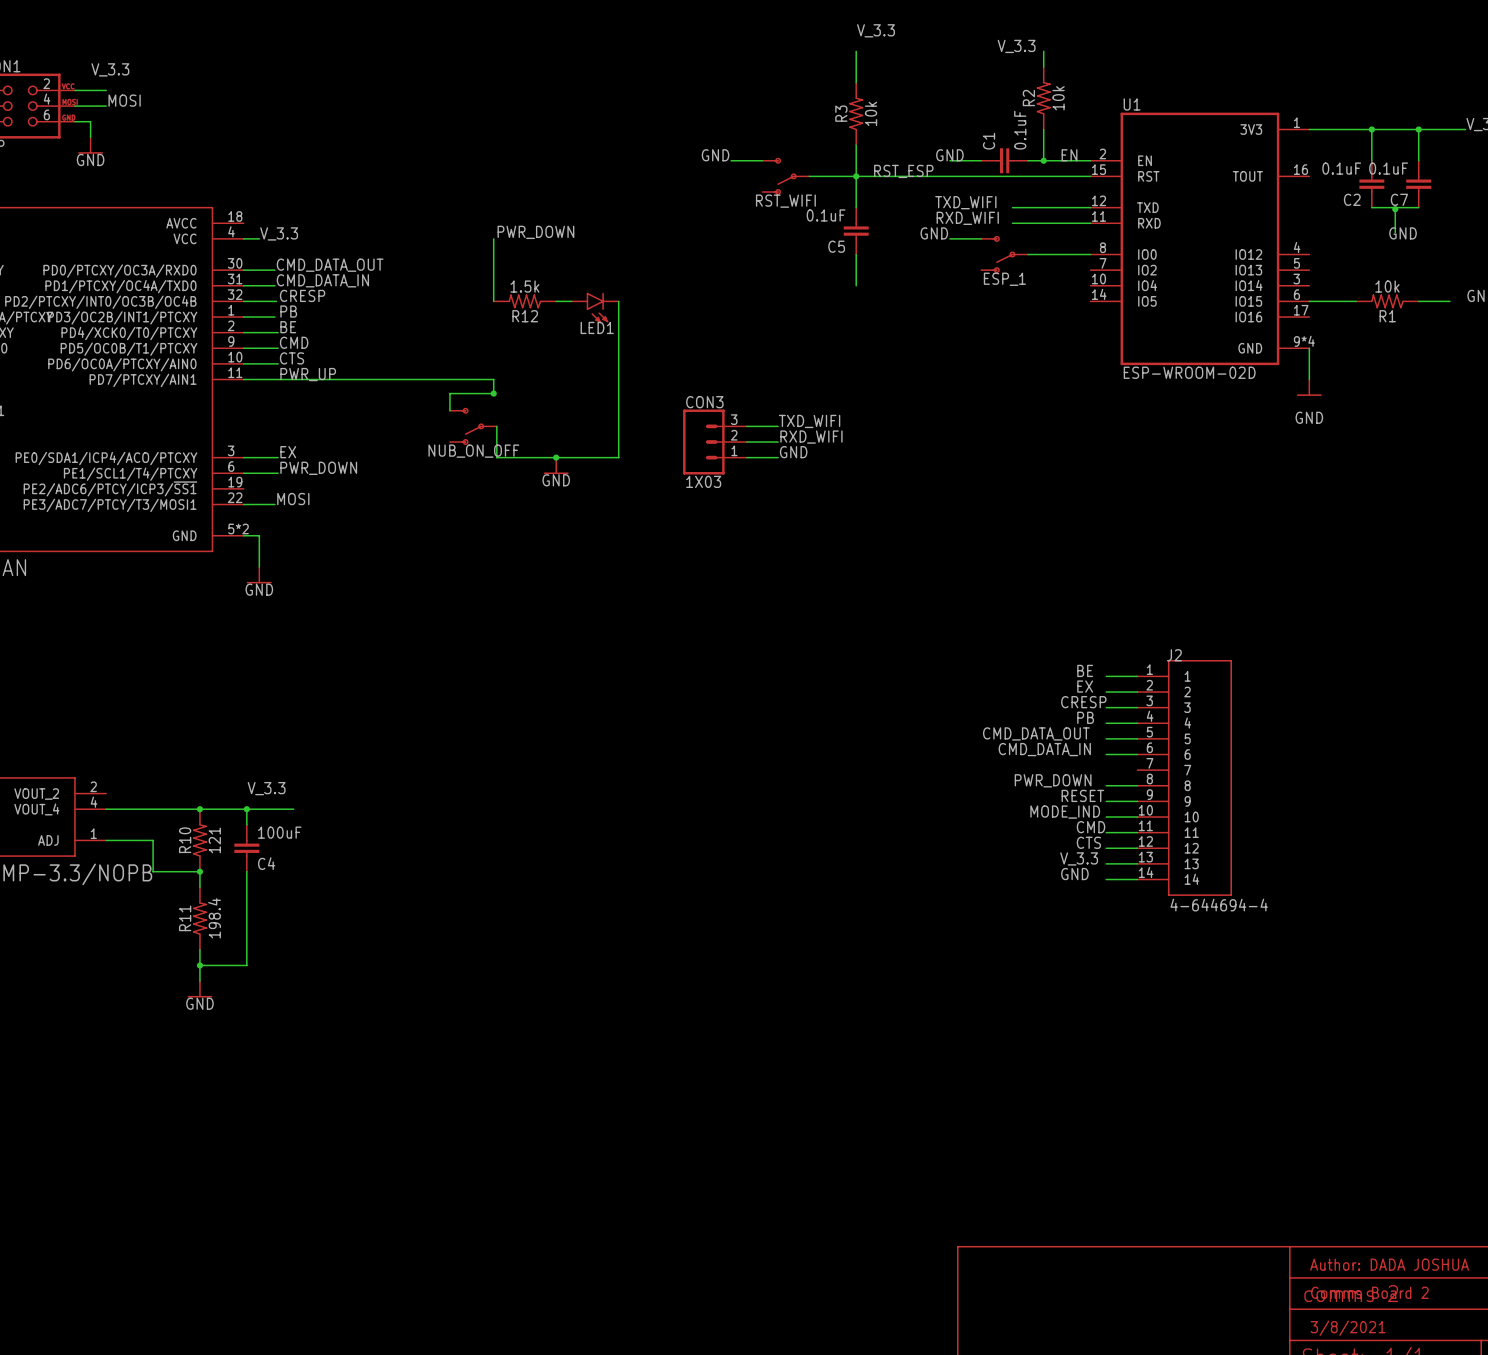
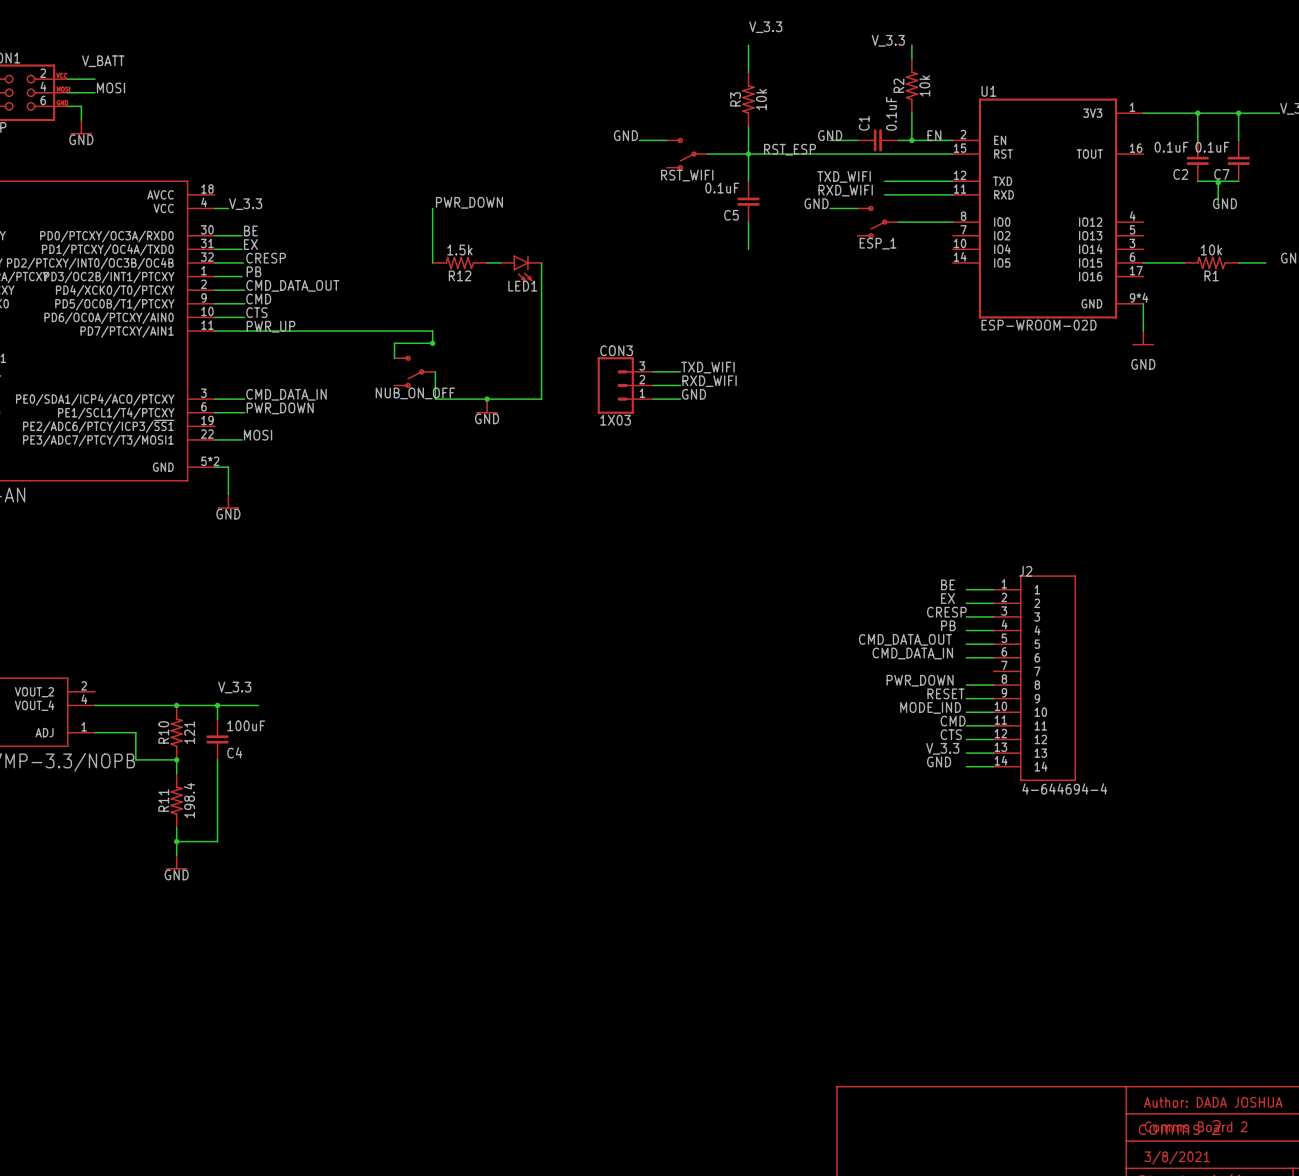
label: V_3.3 (110, 69) -> V_BATT (103, 61)
label: CMD_DATA_OUT (330, 265) -> BE (250, 230)
label: CMD_DATA_IN (322, 280) -> EX (250, 244)
label: BE (288, 327) -> CMD_DATA_OUT (292, 285)
label: EX (288, 452) -> CMD_DATA_IN (286, 394)

